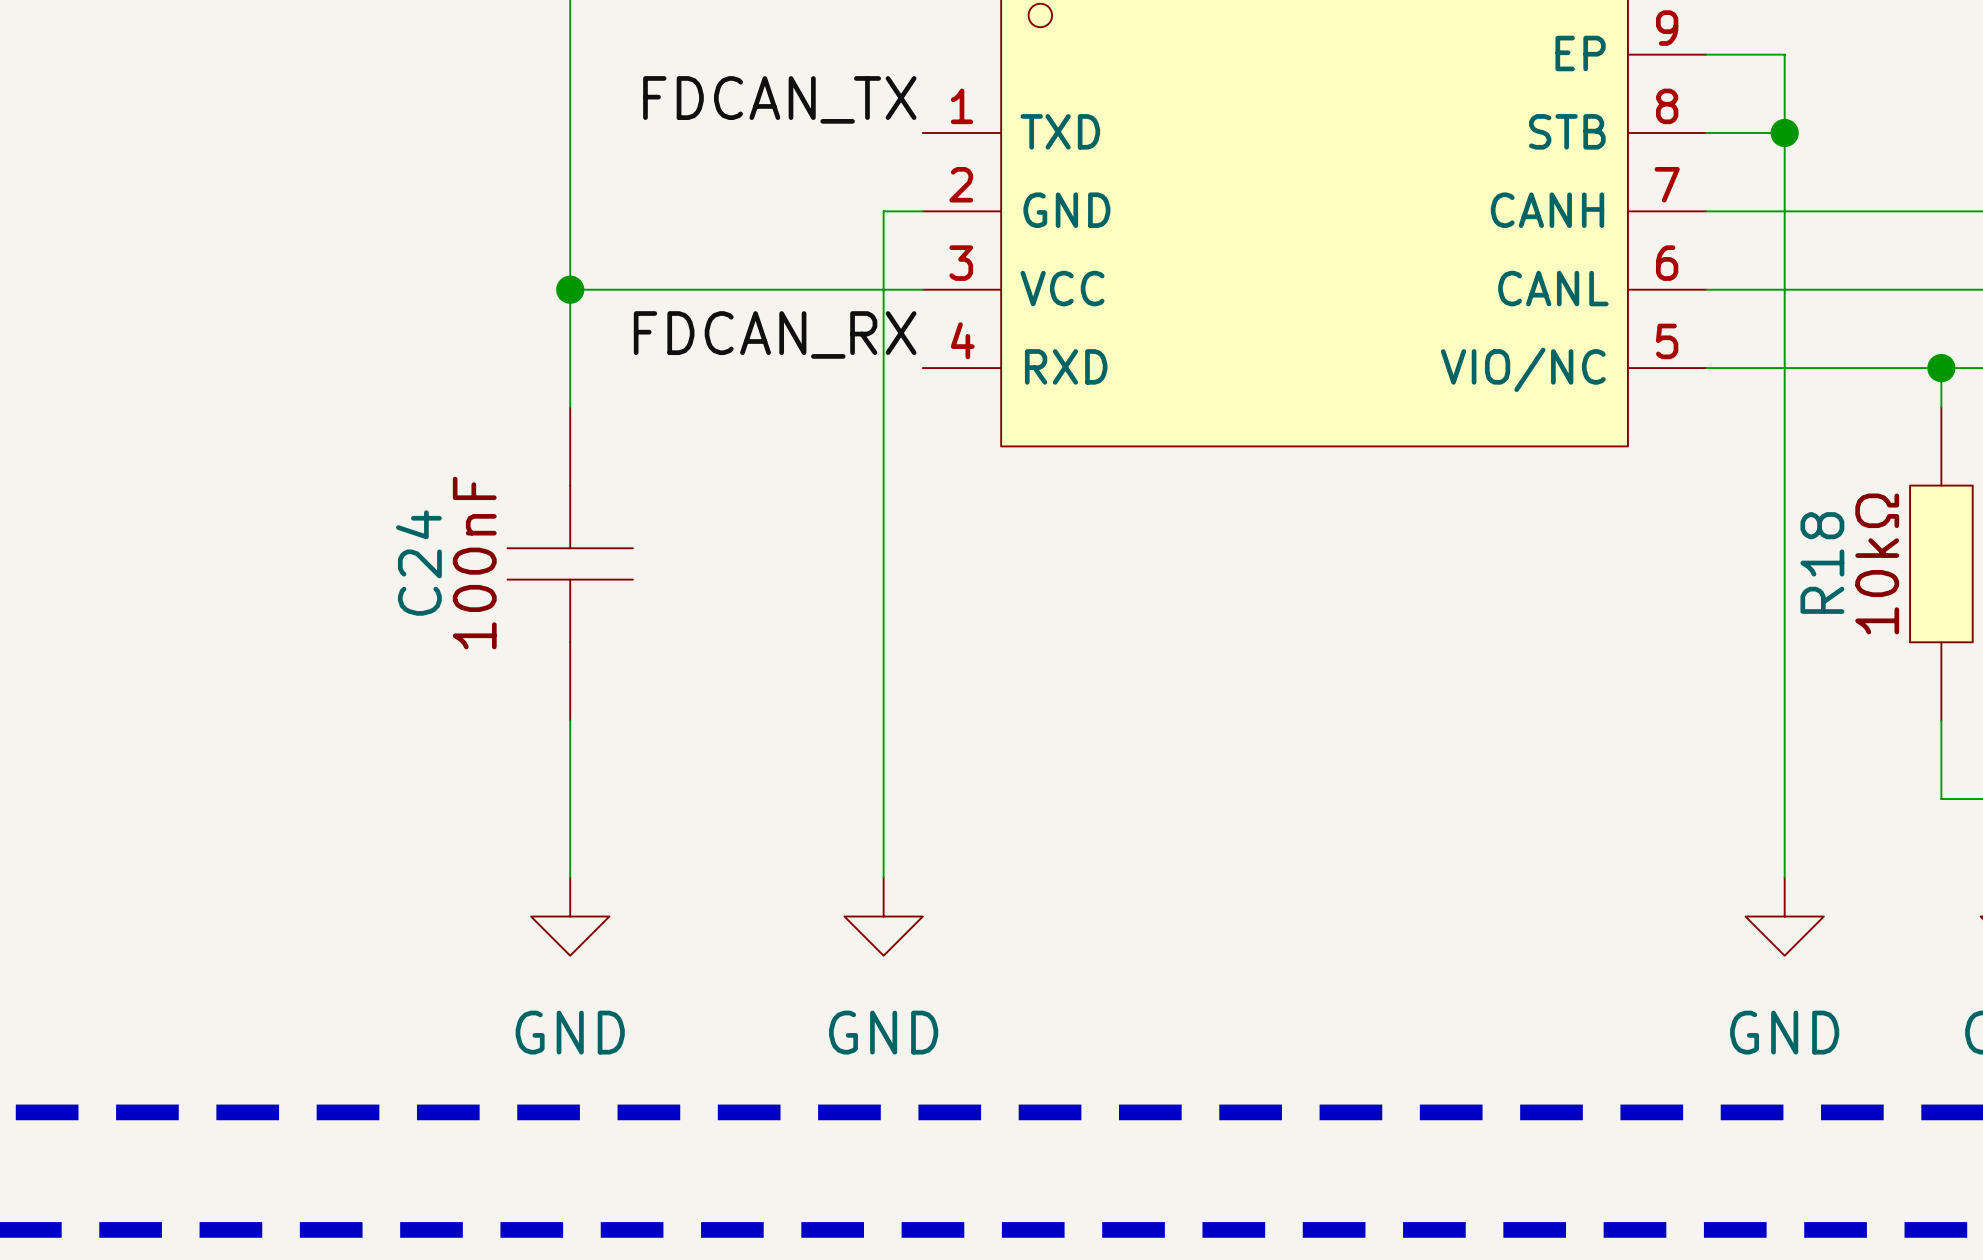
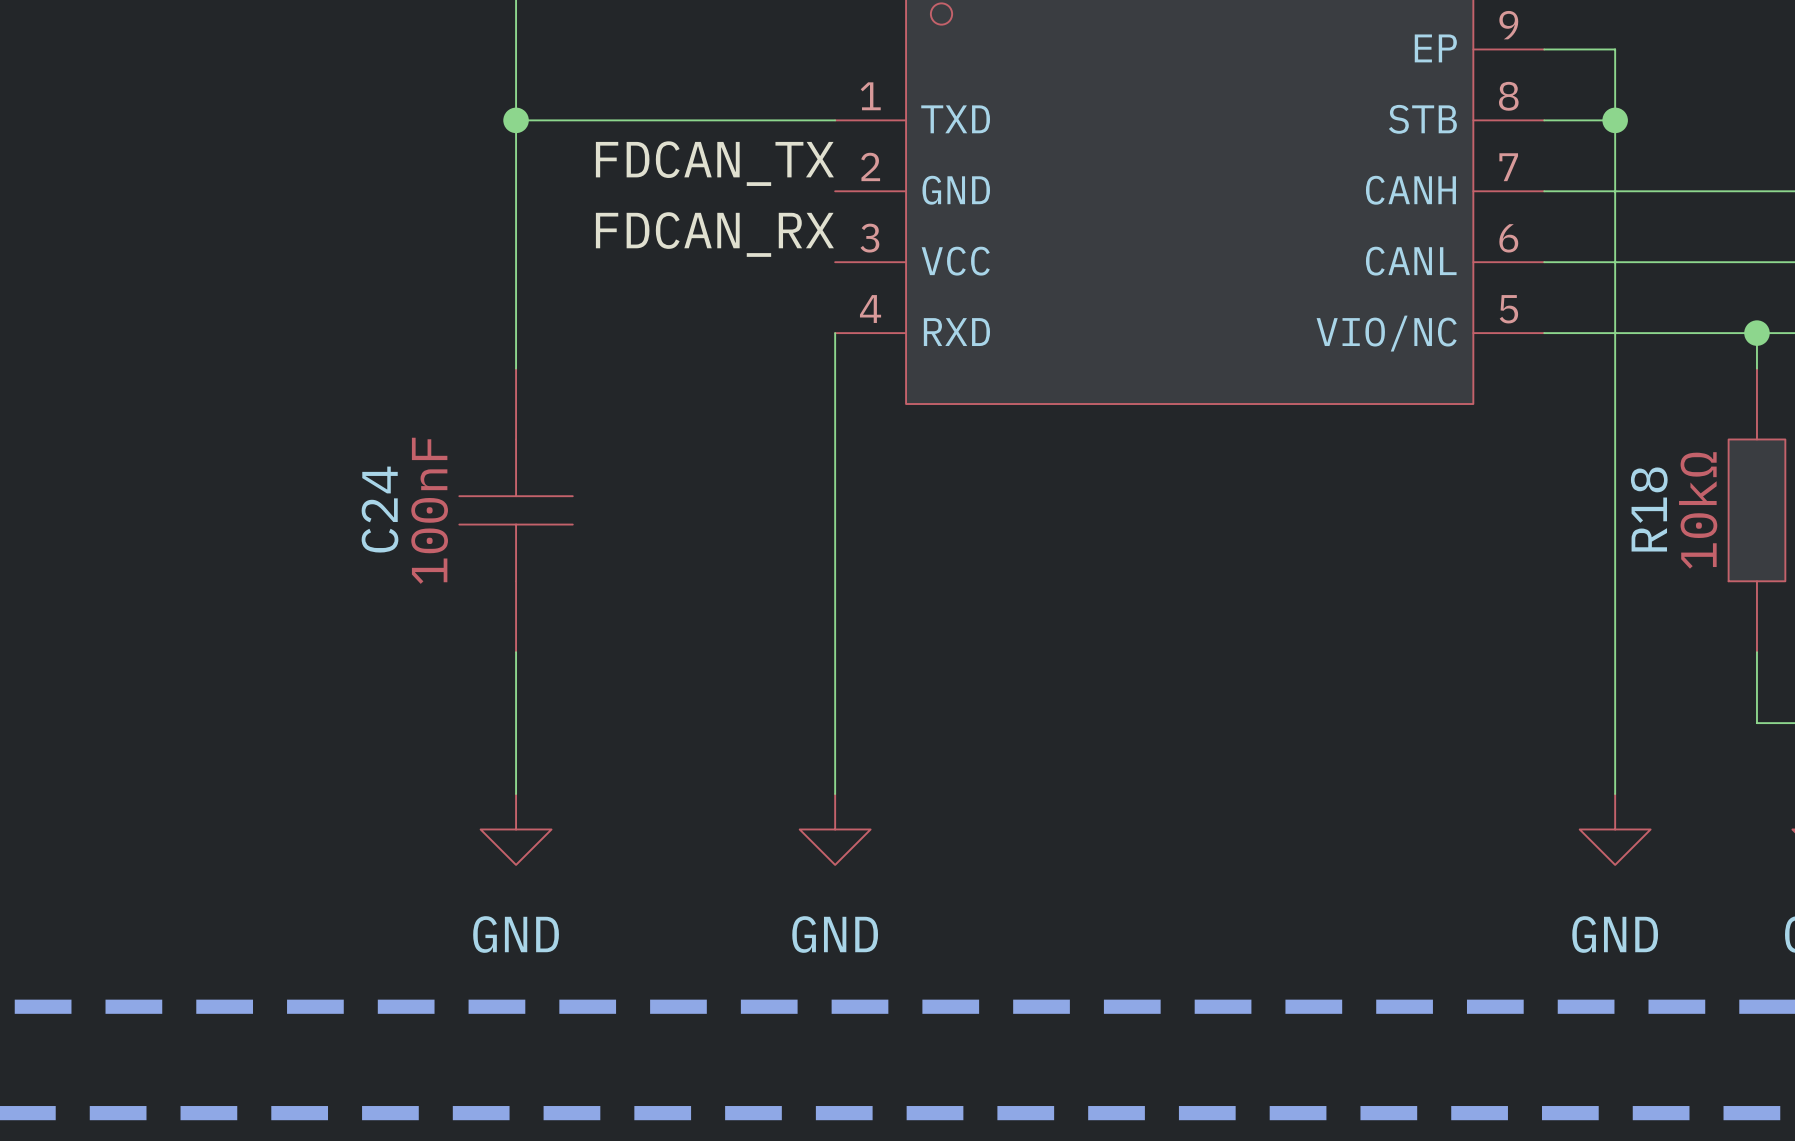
label position: FDCAN_TX (779, 99) -> FDCAN_TX (714, 163)
wire: (922, 211) (883, 211) (883, 877) -> none
wire: (570, 289) (922, 289) -> (516, 120) (835, 120)
junction position: (570, 289) -> (516, 120)
label position: FDCAN_RX (775, 334) -> FDCAN_RX (714, 234)
wire: none -> (835, 333) (835, 794)
power symbol position: GND (883, 916) -> GND (835, 829)

